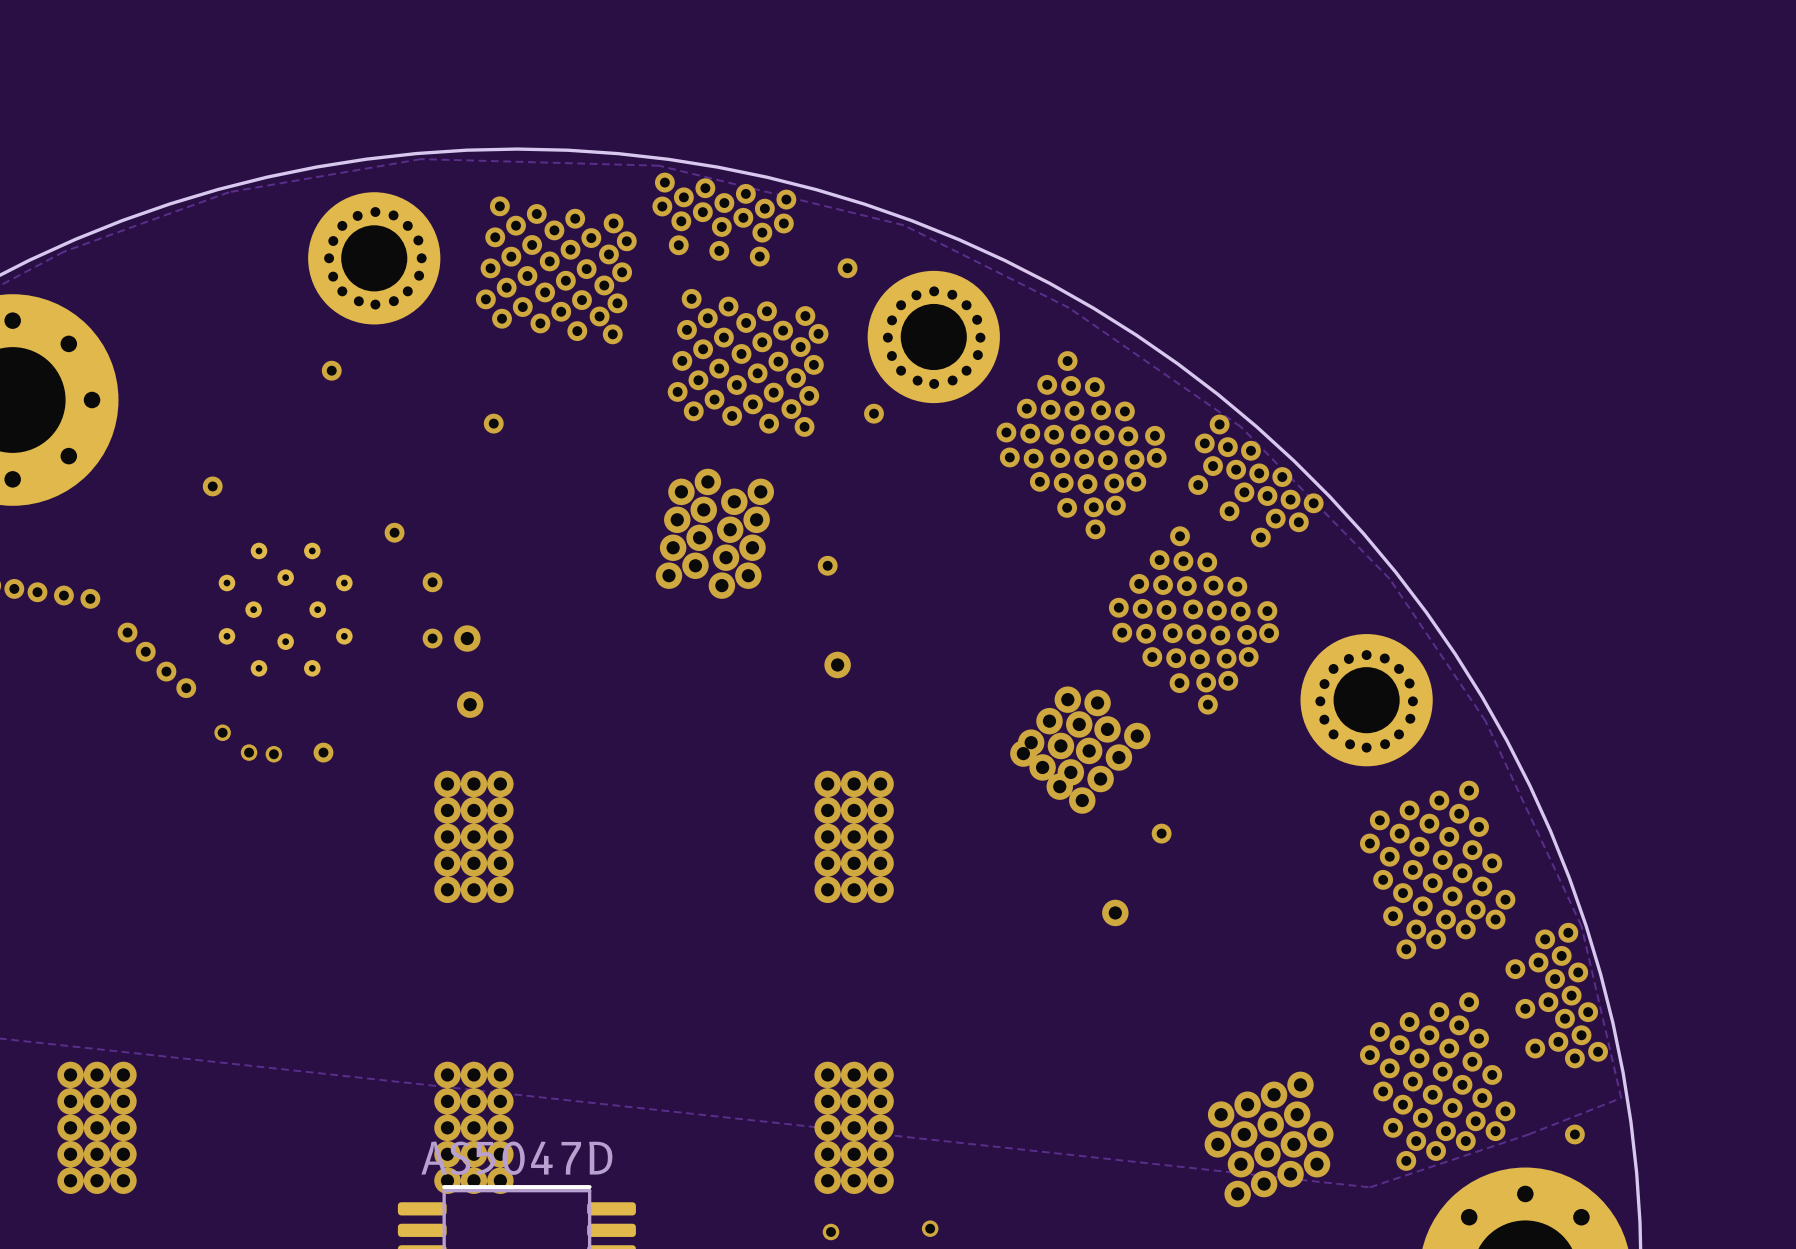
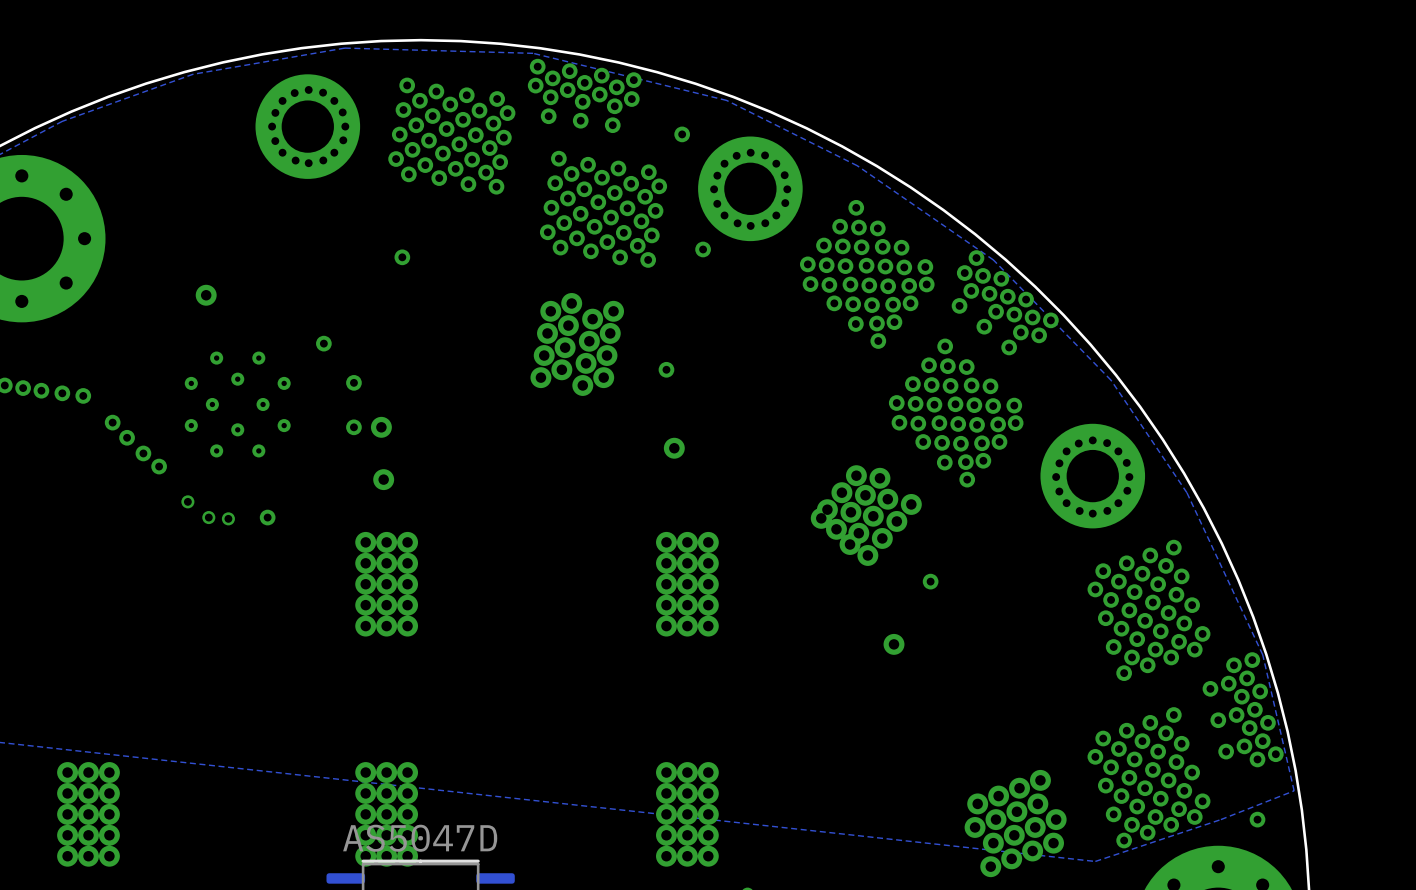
via: (331, 370) -> none
via: none -> (206, 295)
via: (212, 486) -> none

